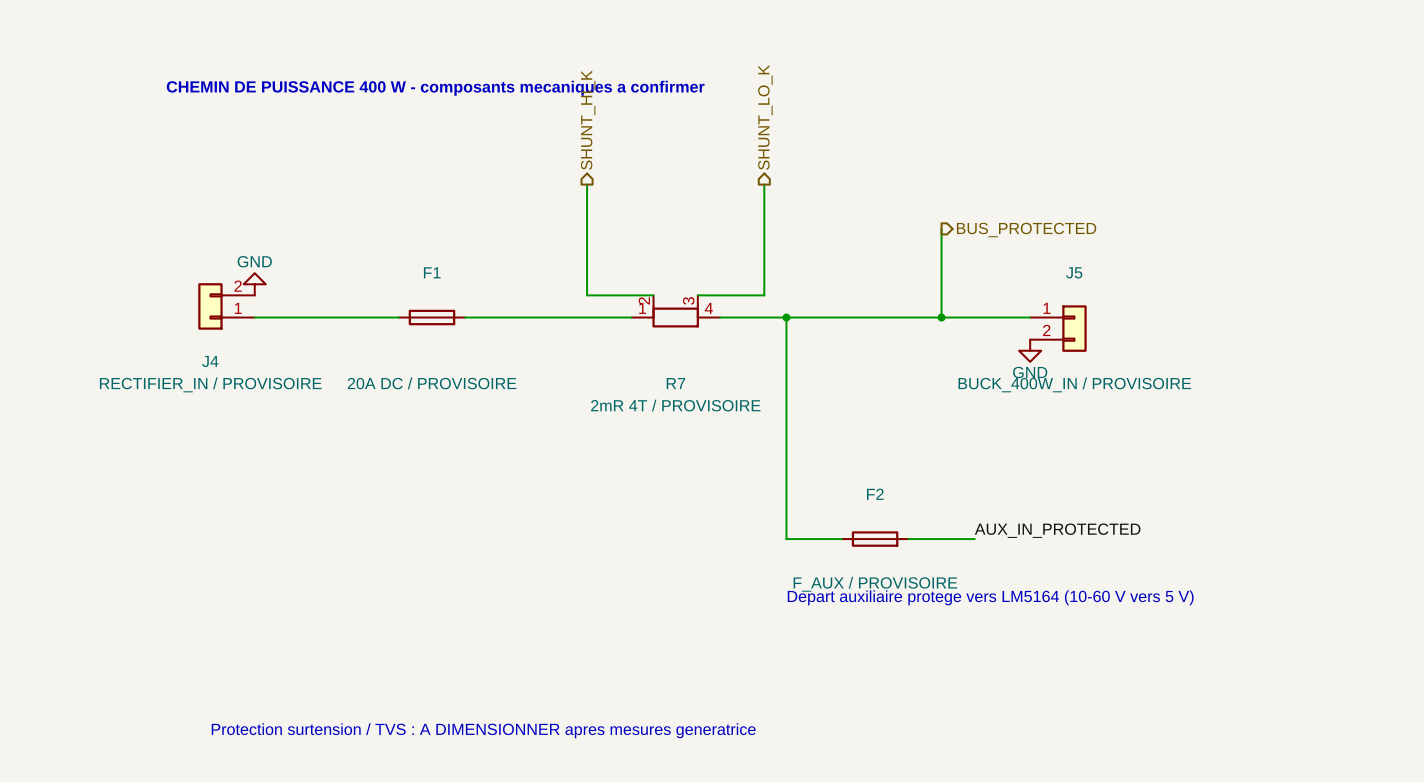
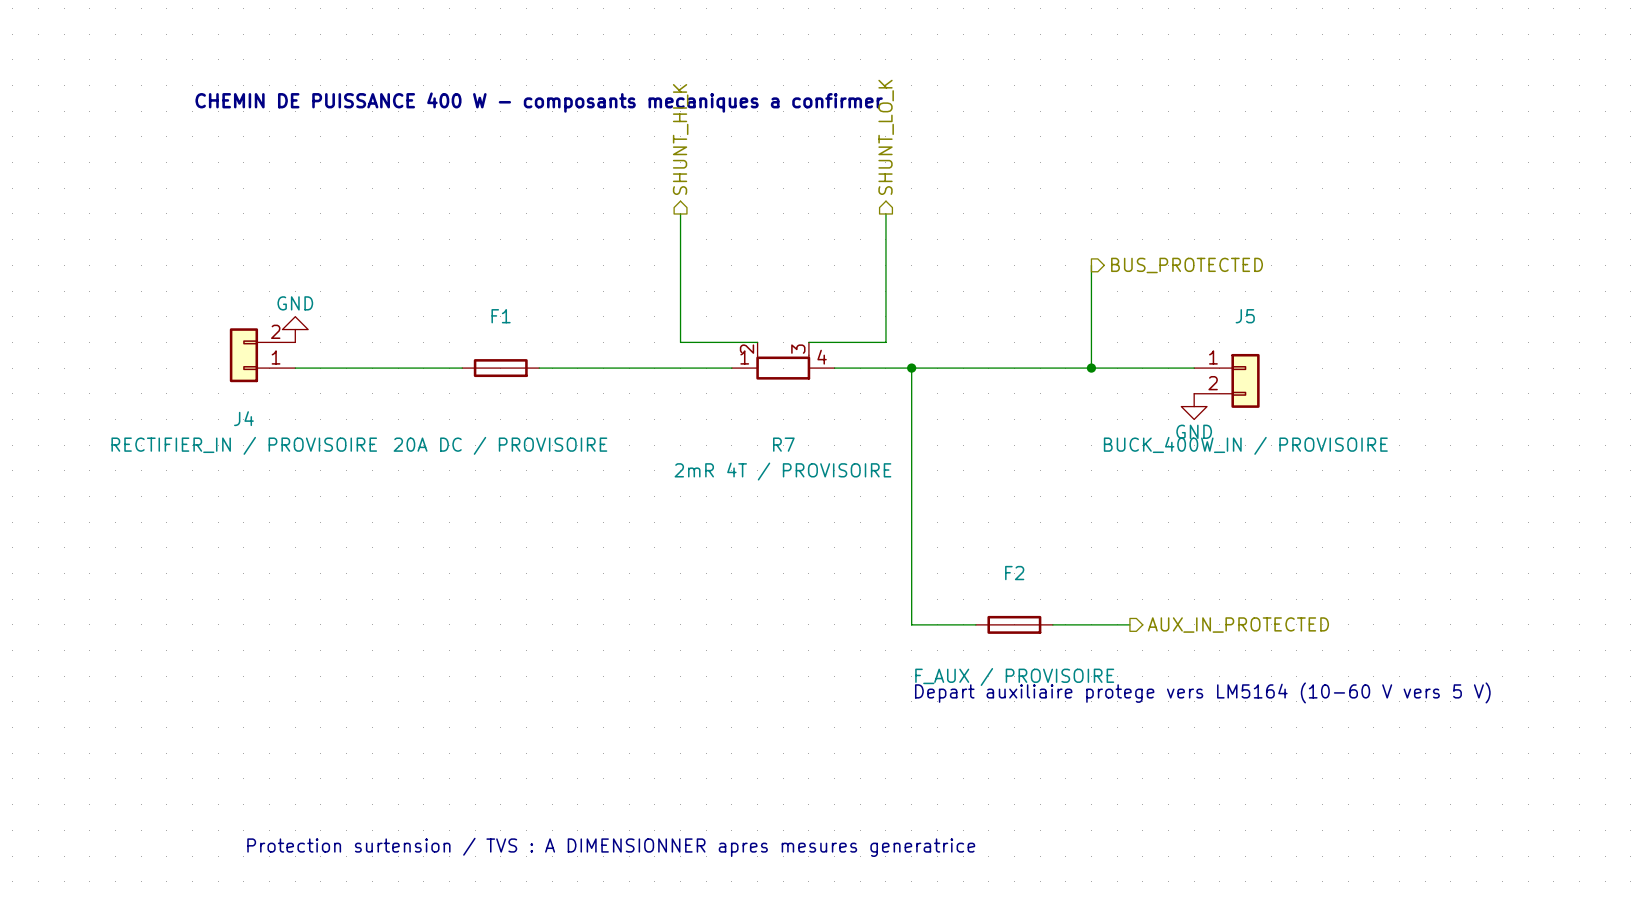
label: AUX_IN_PROTECTED (1057, 530) -> none
hierarchical label: none -> AUX_IN_PROTECTED (1238, 625)

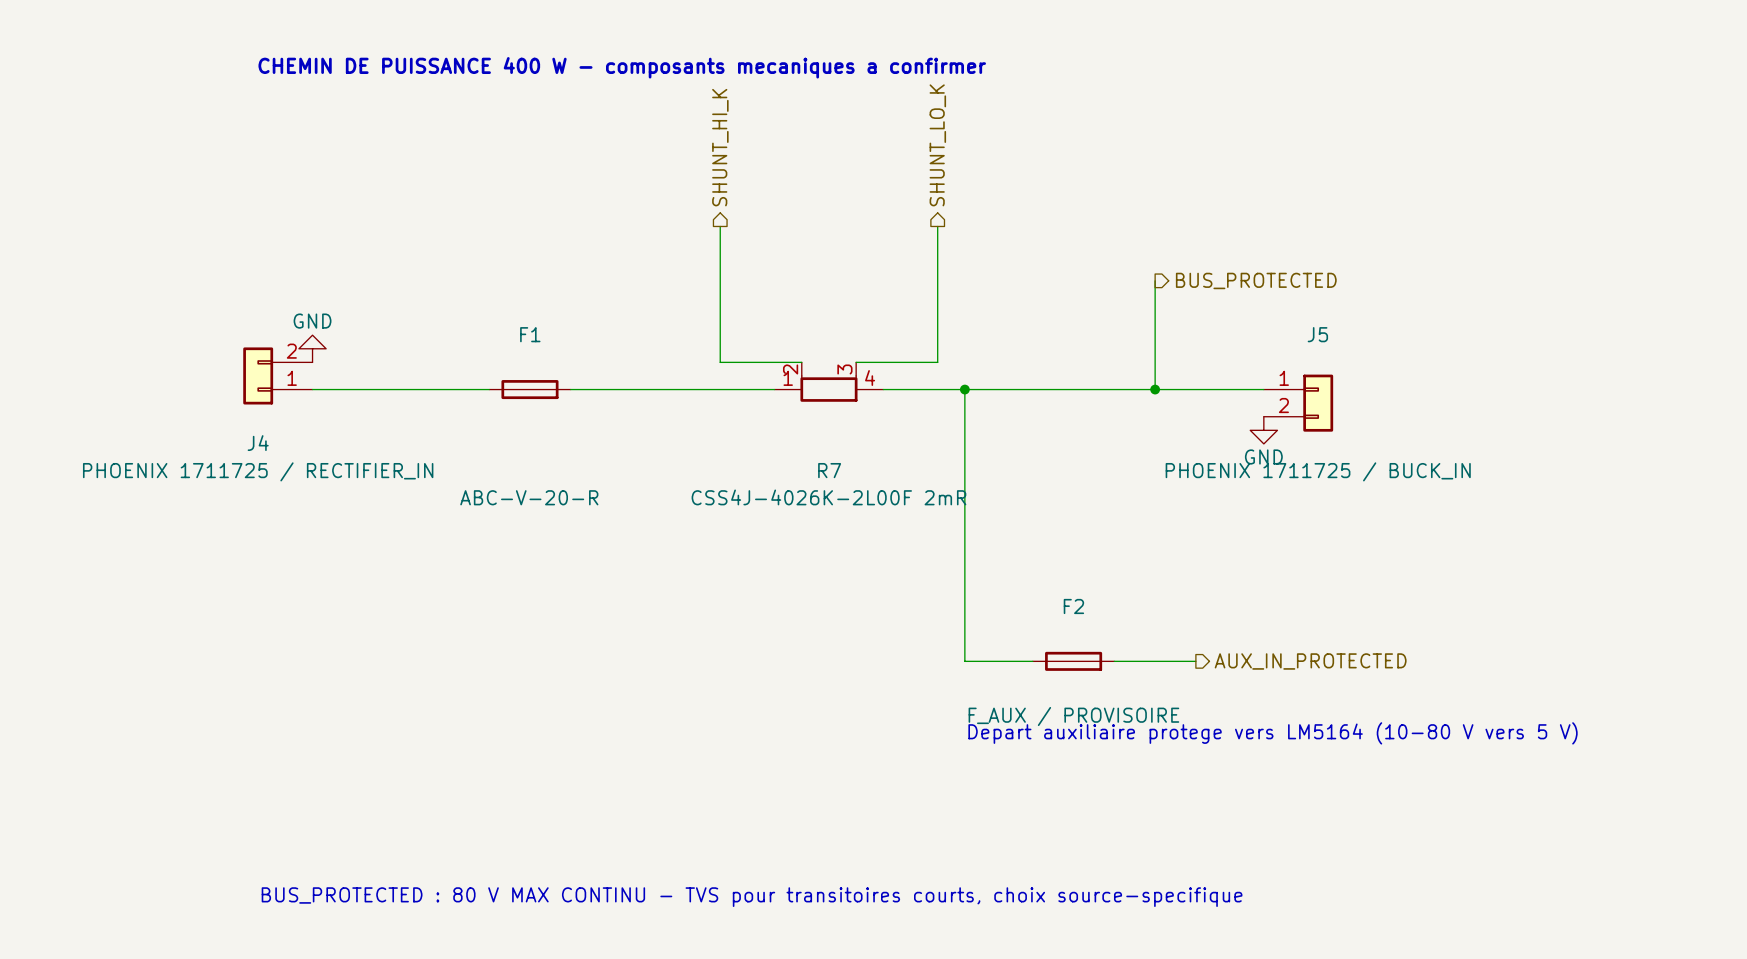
text position: CHEMIN DE PUISSANCE 400 W - composants mecaniques a confirmer (539, 102) -> CHEMIN DE PUISSANCE 400 W - composants mecaniques a confirmer (622, 67)
J4 value: RECTIFIER_IN / PROVISOIRE (244, 445) -> PHOENIX 1711725 / RECTIFIER_IN (258, 471)
F1 value: 20A DC / PROVISOIRE (500, 445) -> ABC-V-20-R (529, 497)
J5 value: BUCK_400W_IN / PROVISOIRE (1245, 445) -> PHOENIX 1711725 / BUCK_IN (1318, 471)
R7 value: 2mR 4T / PROVISOIRE (782, 471) -> CSS4J-4026K-2L00F 2mR (828, 497)
text: Depart auxiliaire protege vers LM5164 (10-60 V vers 5 V) (1202, 692) -> Depart auxiliaire protege vers LM5164 (10-80 V vers 5 V) (1273, 733)
text: Protection surtension / TVS : A DIMENSIONNER apres mesures generatrice (611, 847) -> BUS_PROTECTED : 80 V MAX CONTINU - TVS pour transitoires courts, choix source-specifique (752, 897)

